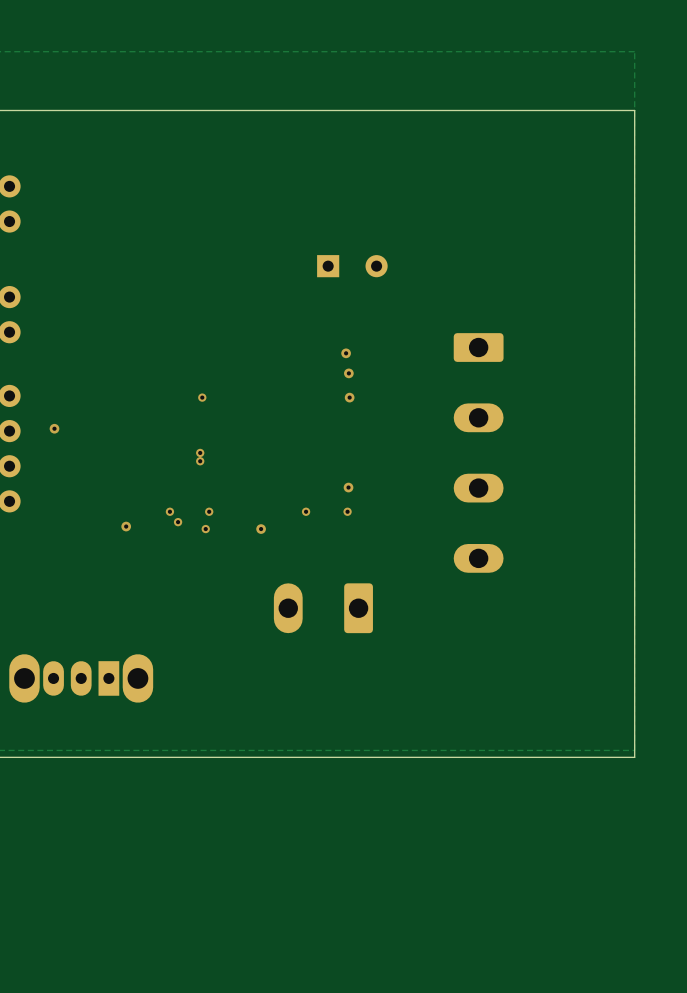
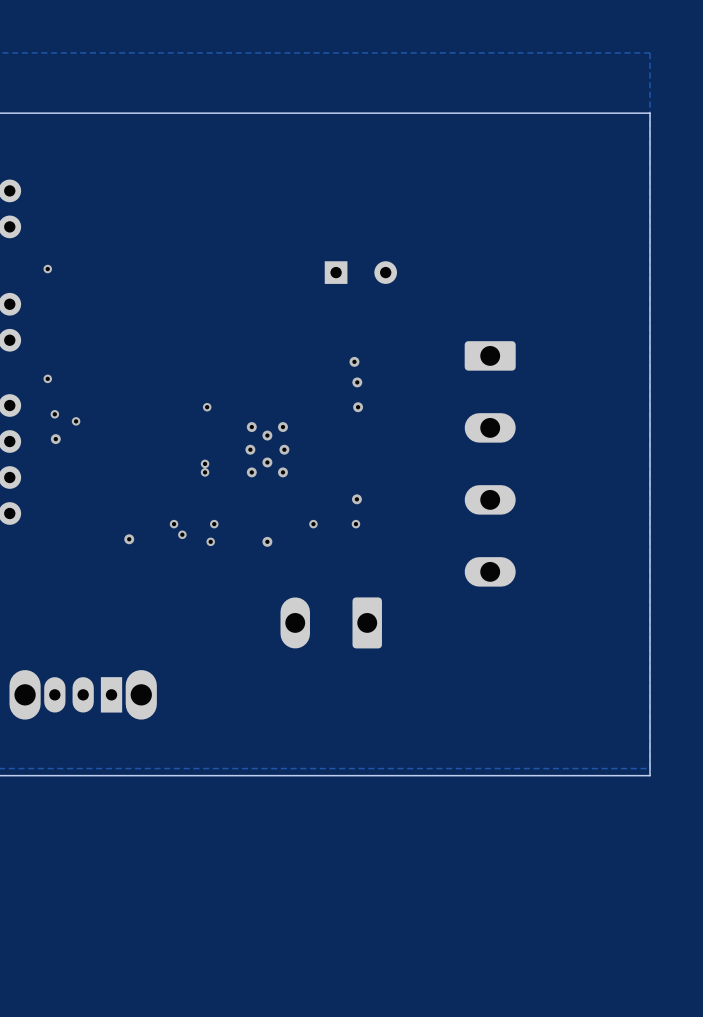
via: none -> (47, 269)
via: none -> (47, 378)
via: none -> (54, 414)
via: none -> (76, 421)
via: none -> (251, 427)
via: none -> (282, 427)
via: none -> (267, 435)
via: none -> (250, 449)
via: none -> (284, 449)
via: none -> (267, 462)
via: none -> (251, 472)
via: none -> (282, 472)

